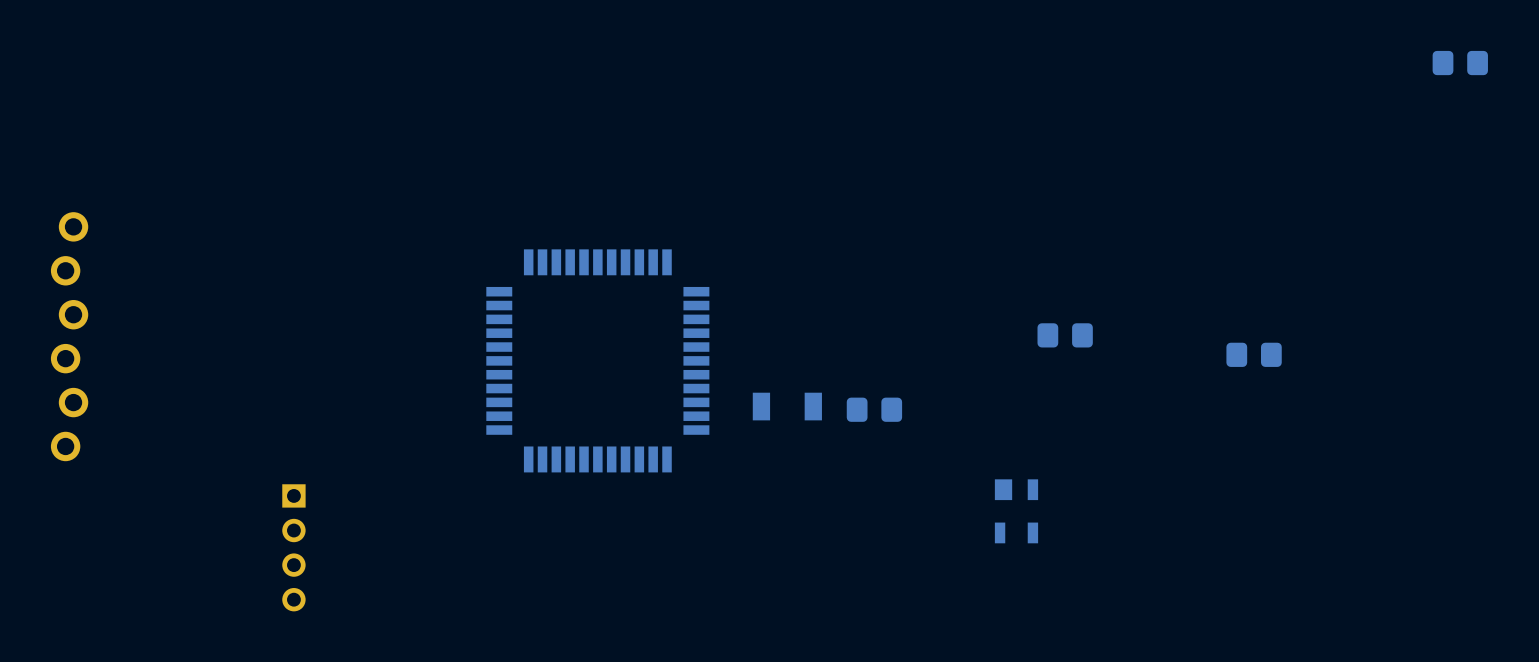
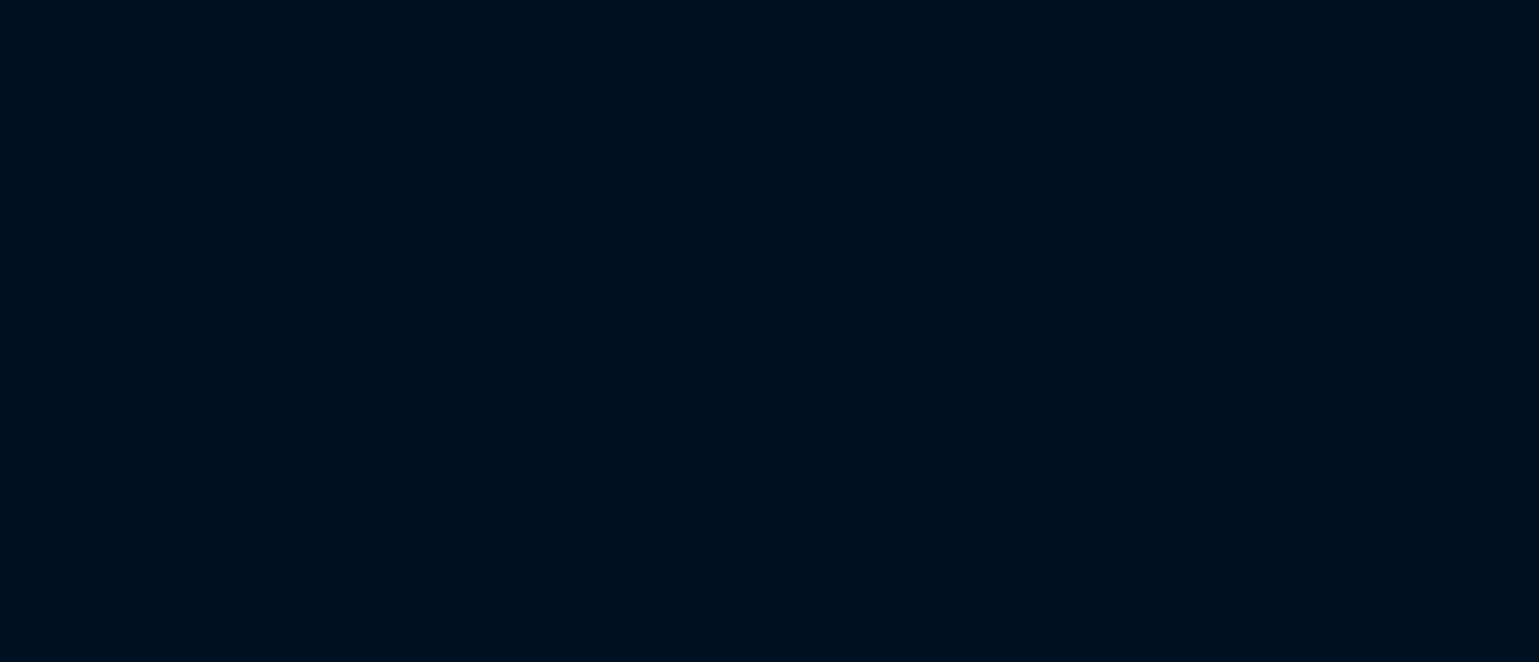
part: (1460, 63) -> none
part: (1065, 335) -> none
part: (69, 336) -> none
part: (1254, 354) -> none
part: (597, 360) -> none
part: (787, 406) -> none
part: (874, 409) -> none
part: (1016, 511) -> none
part: (293, 547) -> none

